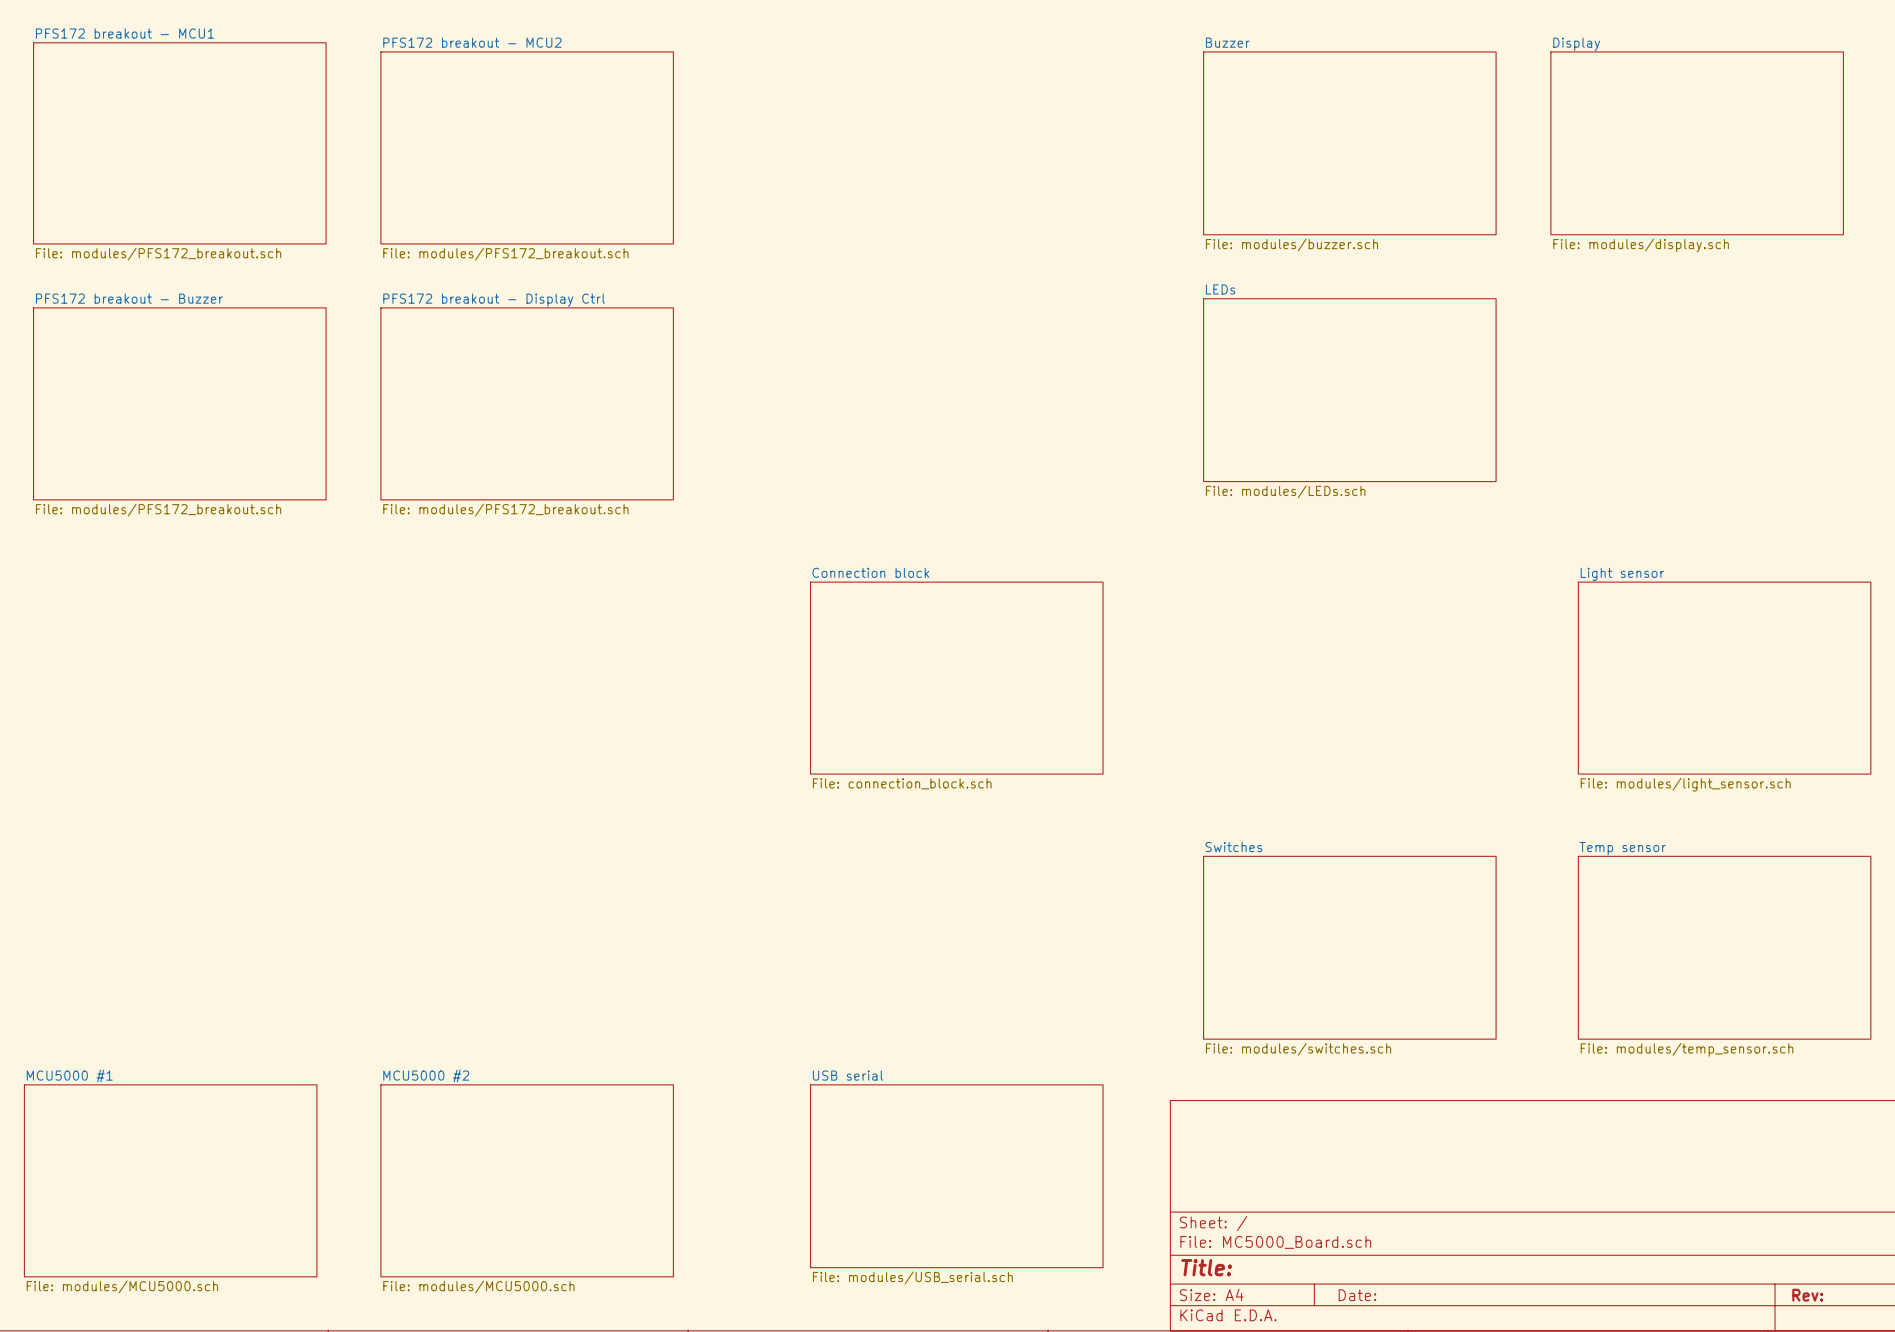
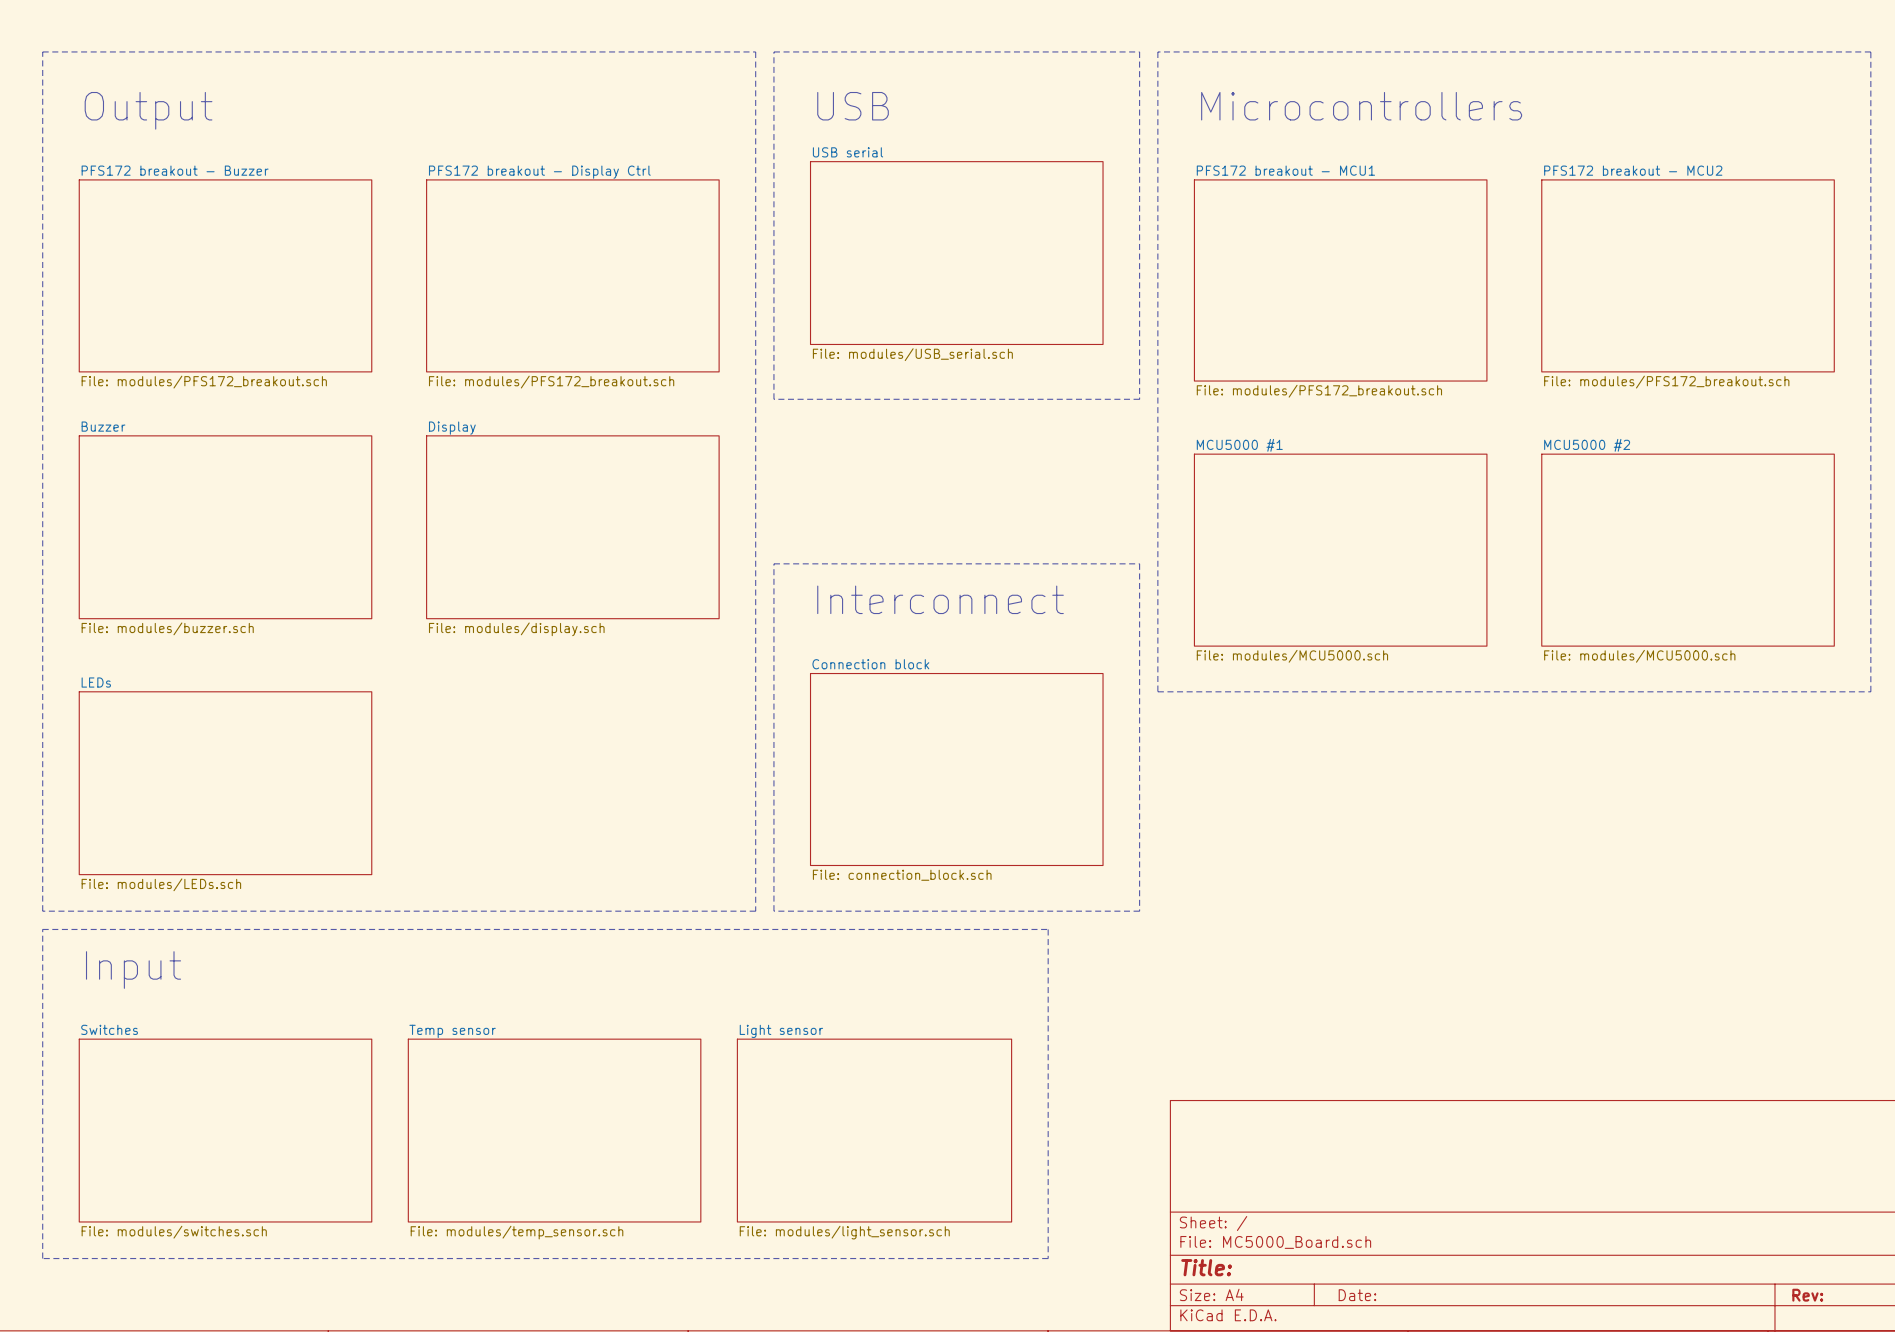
line: none -> (42, 51) (755, 51) (755, 911) (42, 911) (42, 51)
line: none -> (773, 51) (1139, 51) (1139, 399) (773, 399) (773, 51)
line: none -> (1157, 51) (1157, 691) (1870, 691) (1870, 51) (1157, 51)
text: none -> USB (853, 106)
text: none -> Microcontrollers (1361, 106)
text: none -> Output (148, 110)
sheet PFS172 breakout - MCU1 position: (179, 143) -> (1340, 280)
sheet Buzzer: File: modules/buzzer.sch (1349, 143) -> none
sheet Display: File: modules/display.sch (1697, 143) -> none
sheet PFS172 breakout - MCU2 position: (527, 147) -> (1688, 275)
sheet USB serial: none -> File: modules/USB_serial.sch (956, 253)
sheet LEDs: File: modules/LEDs.sch (1349, 390) -> none
sheet PFS172 breakout - Buzzer position: (179, 403) -> (225, 275)
sheet PFS172 breakout - Display Ctrl position: (527, 403) -> (572, 275)
sheet Buzzer: none -> File: modules/buzzer.sch (225, 527)
sheet Display: none -> File: modules/display.sch (572, 527)
line: none -> (773, 563) (1139, 563) (1139, 911) (773, 911) (773, 563)
text: none -> Interconnect (940, 599)
sheet Connection block position: (956, 678) -> (956, 769)
sheet Light sensor: File: modules/light_sensor.sch (1724, 678) -> none
sheet LEDs: none -> File: modules/LEDs.sch (225, 783)
line: none -> (42, 929) (42, 1258) (1048, 1258) (1048, 929) (42, 929)
sheet Switches: File: modules/switches.sch (1349, 947) -> none
sheet Temp sensor: File: modules/temp_sensor.sch (1724, 947) -> none
text: none -> Input (133, 970)
sheet Switches: none -> File: modules/switches.sch (225, 1130)
sheet Temp sensor: none -> File: modules/temp_sensor.sch (554, 1130)
sheet Light sensor: none -> File: modules/light_sensor.sch (874, 1130)
sheet USB serial: File: modules/USB_serial.sch (956, 1176) -> none
sheet MCU5000 #1 position: (170, 1180) -> (1340, 550)
sheet MCU5000 #2 position: (527, 1180) -> (1688, 550)

